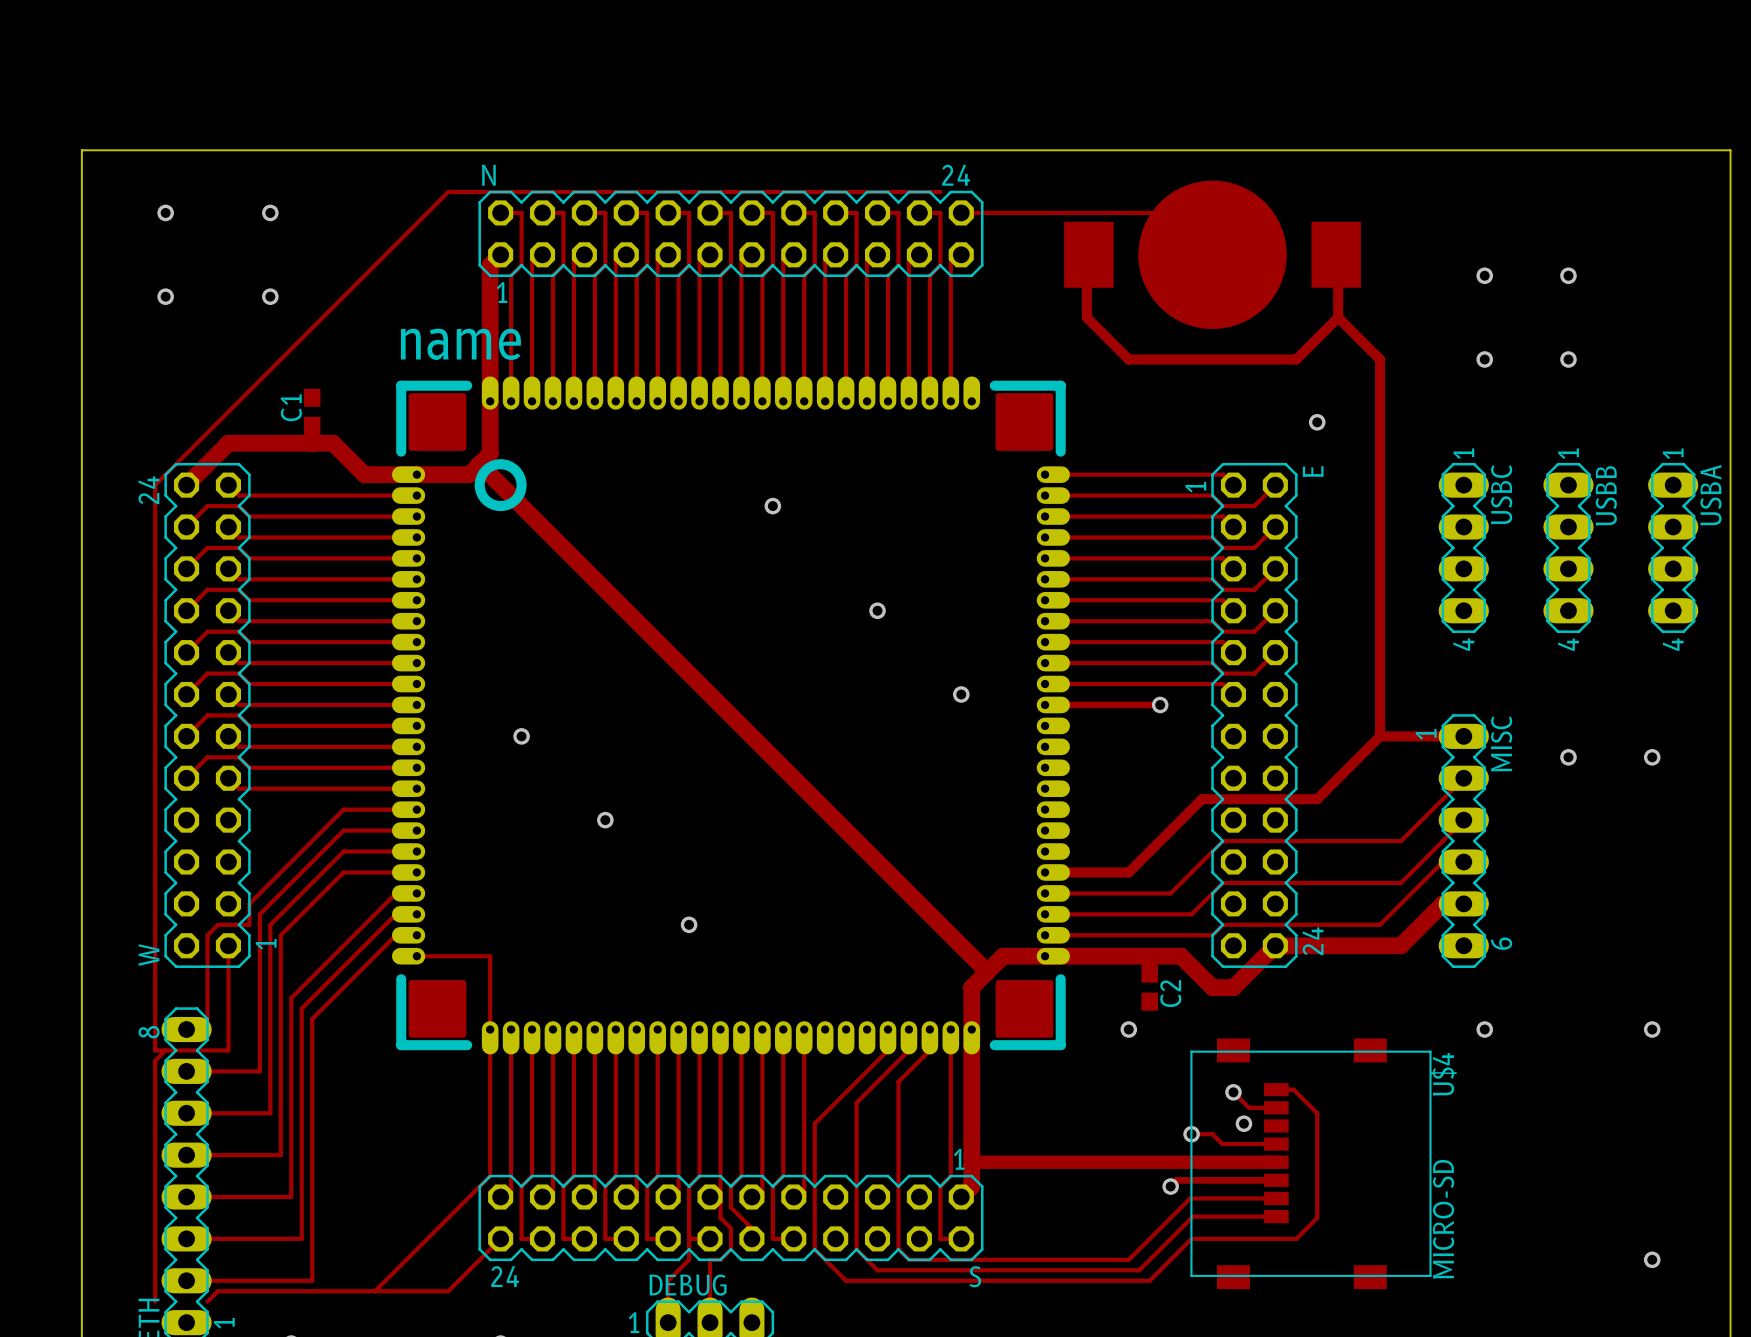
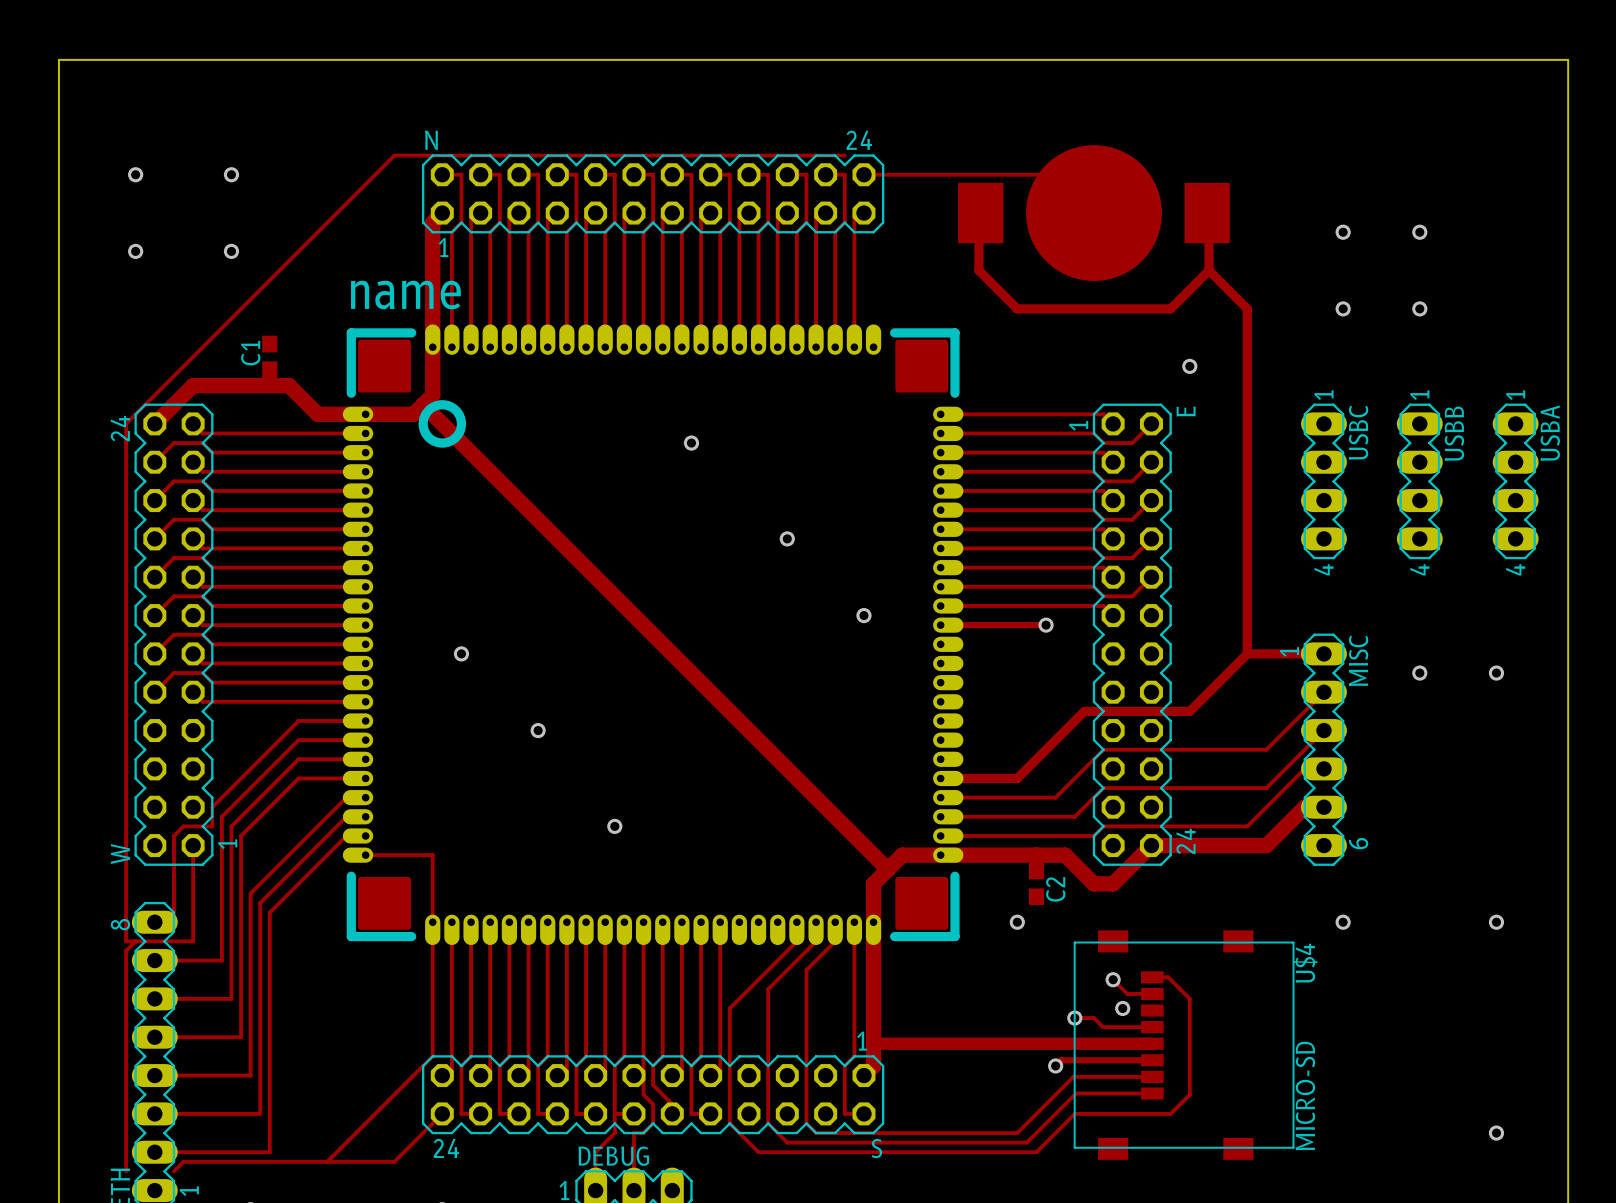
board edge: (81, 150) (1730, 150) -> (58, 117) (58, 59) (1568, 59) (1568, 117)

